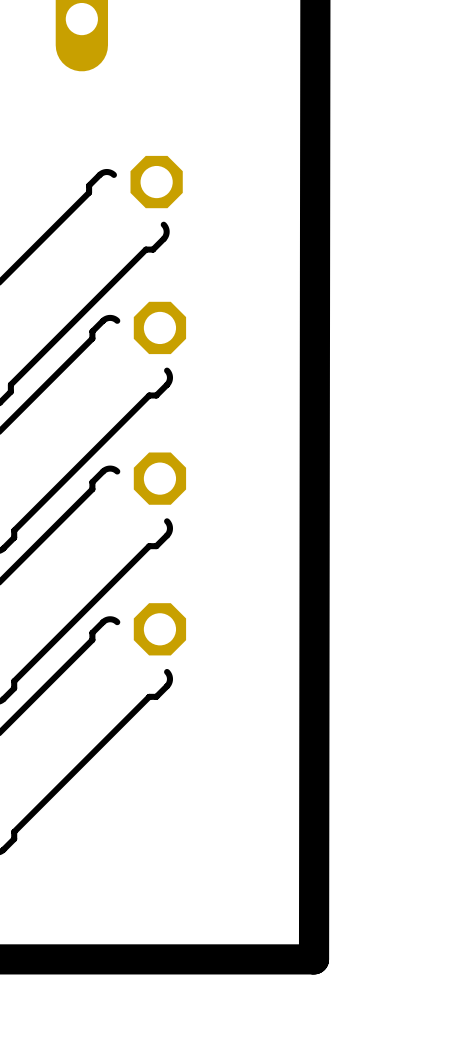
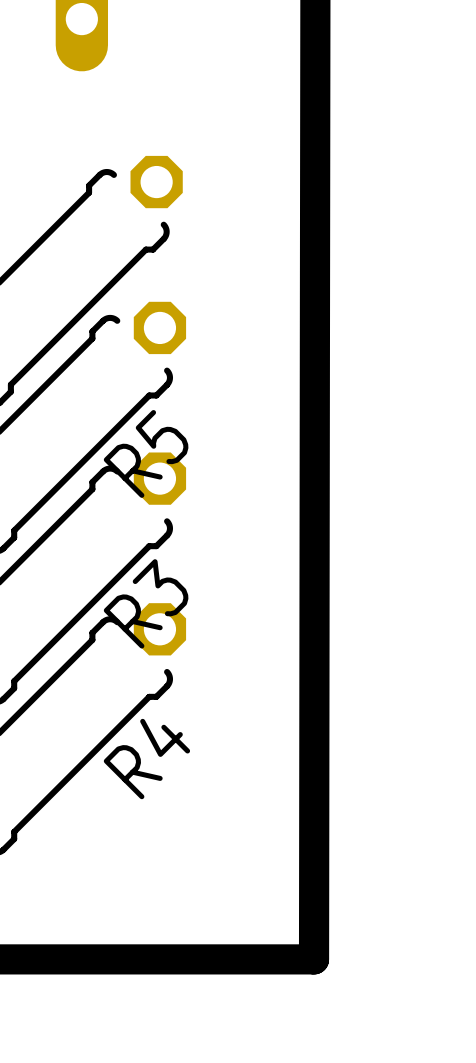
R5 name: none -> R5 (146, 453)
R3 name: none -> R3 (146, 603)
R4 name: none -> R4 (146, 759)

